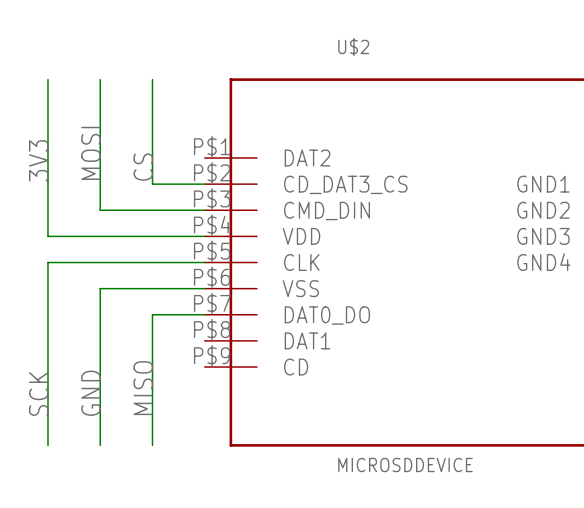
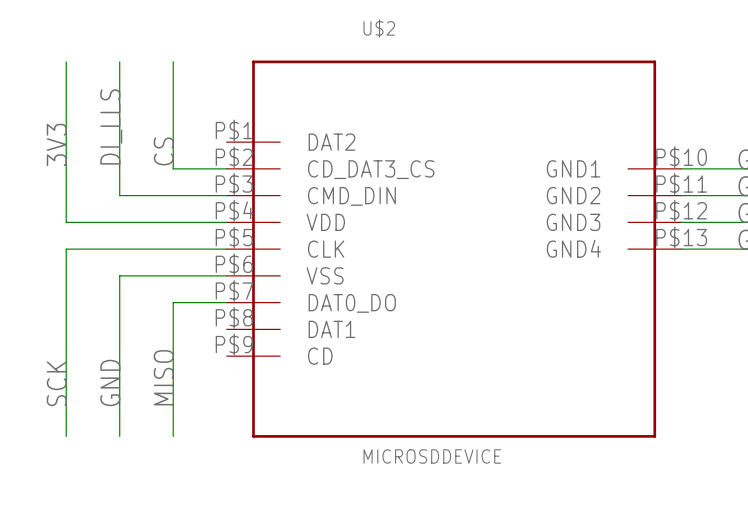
label: MOSI (91, 153) -> DI_LLS (111, 126)

